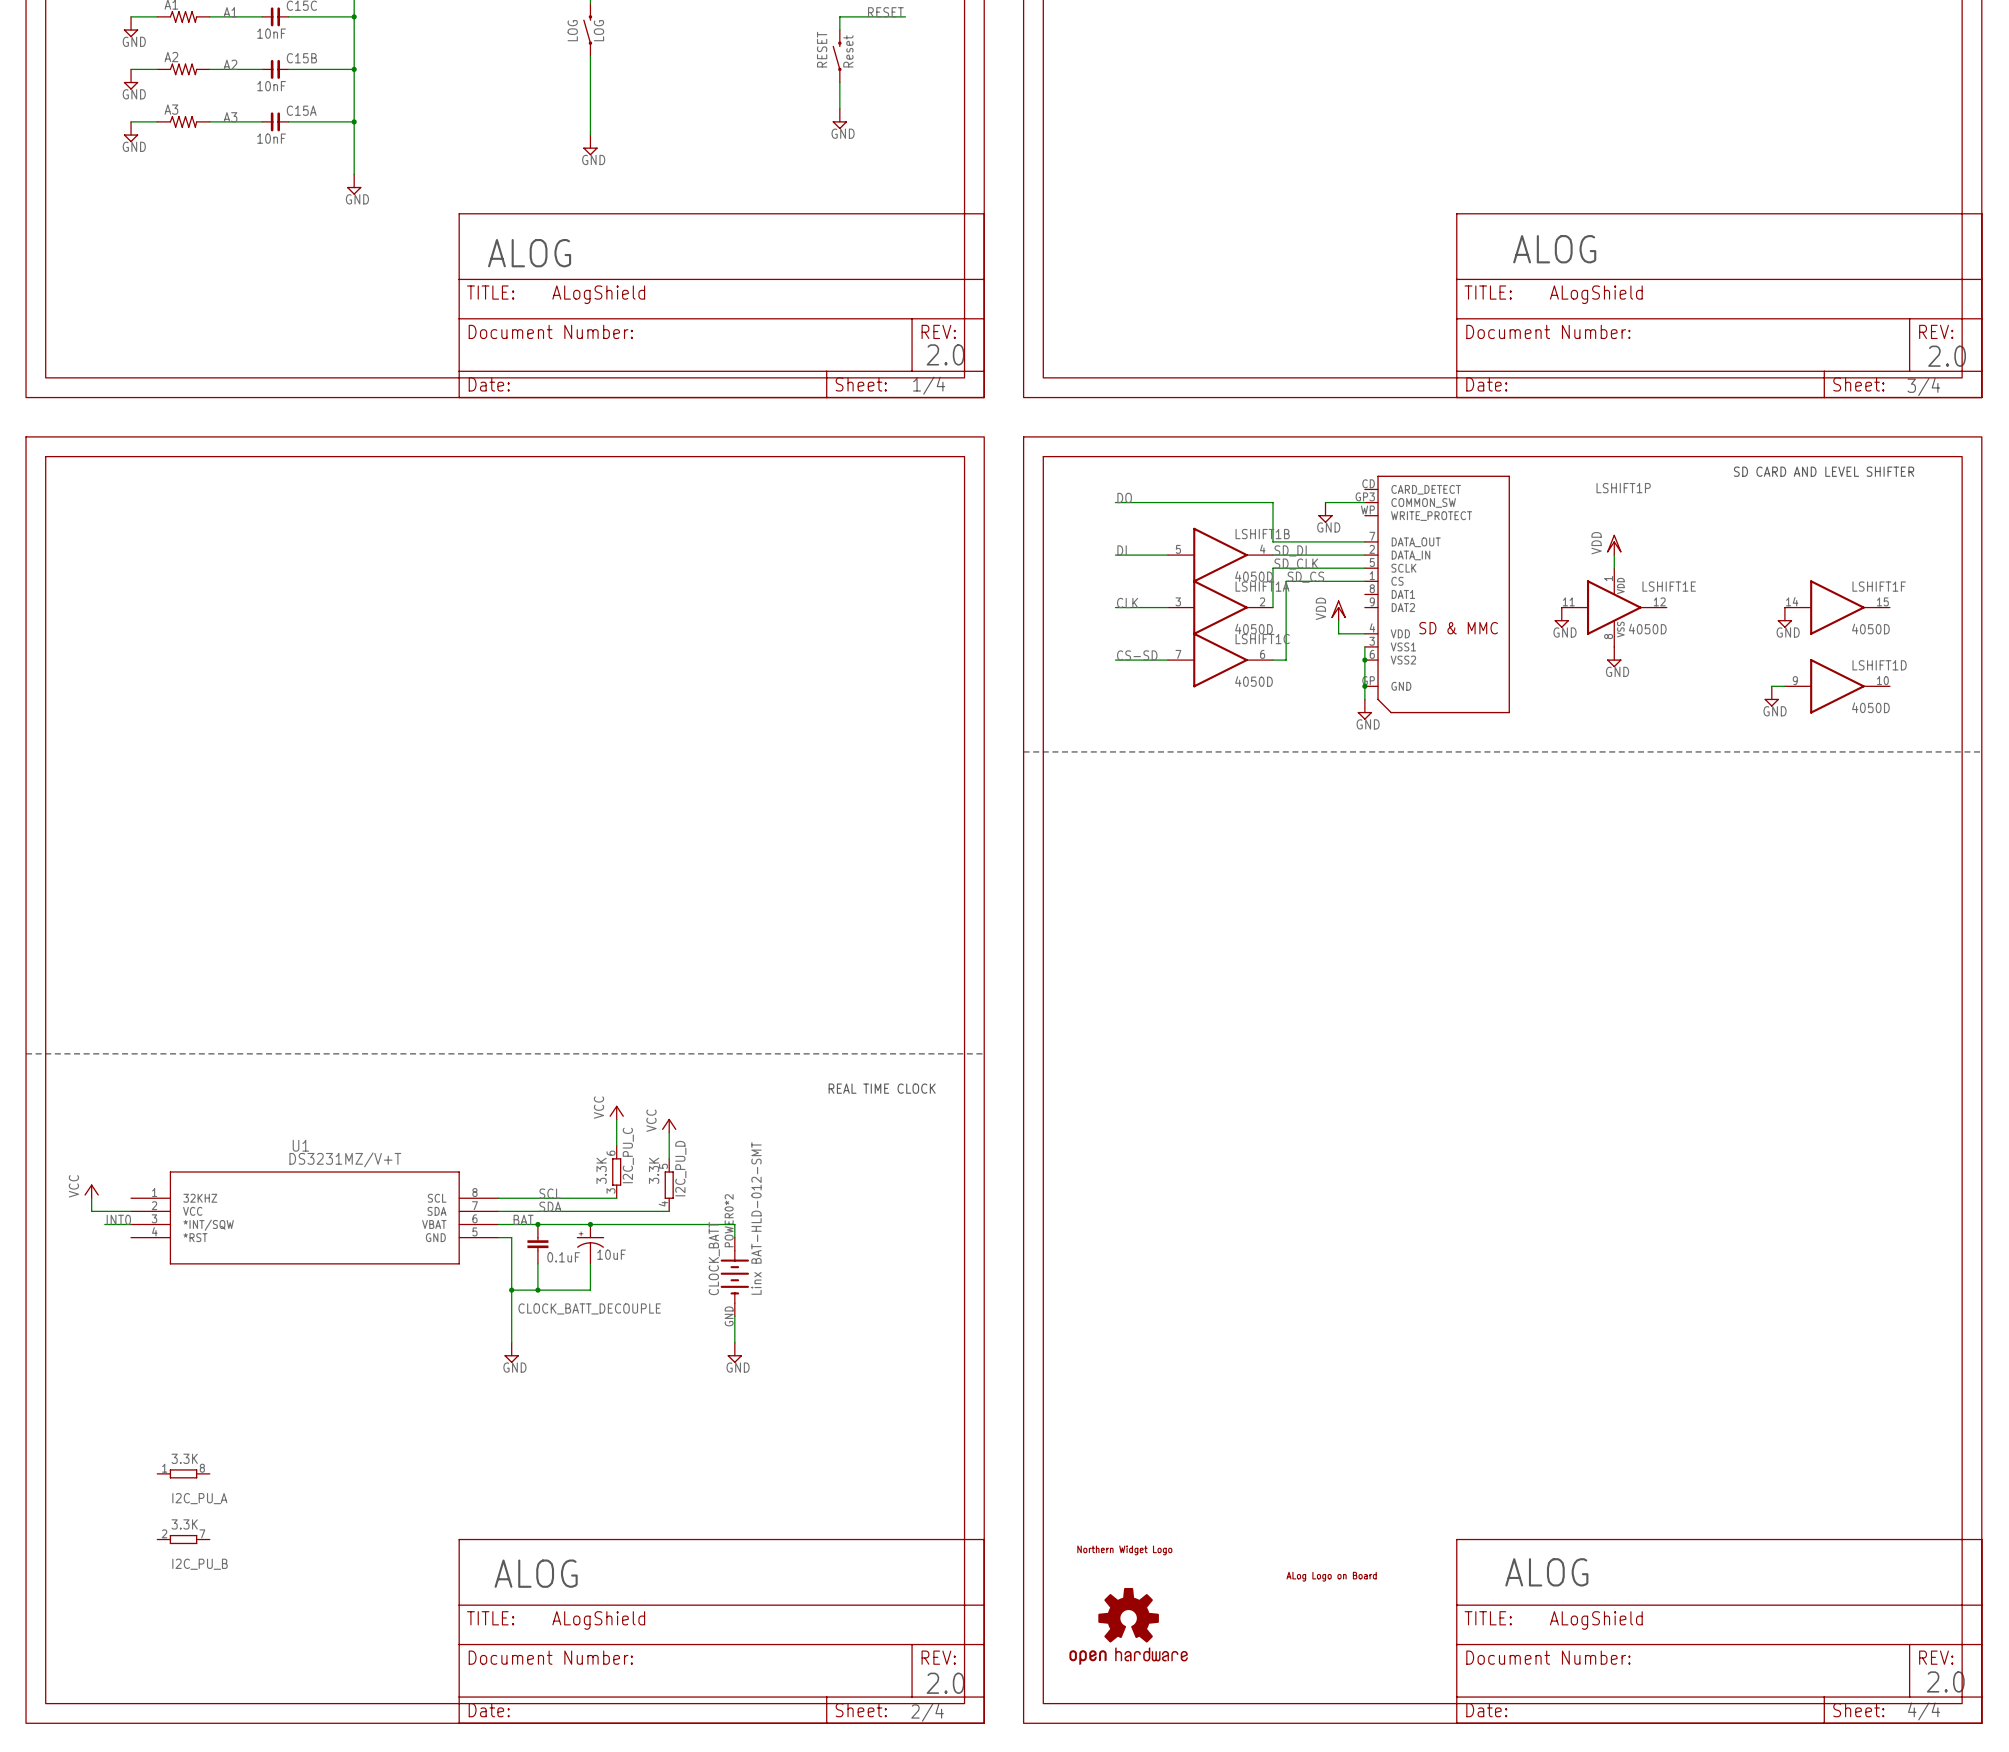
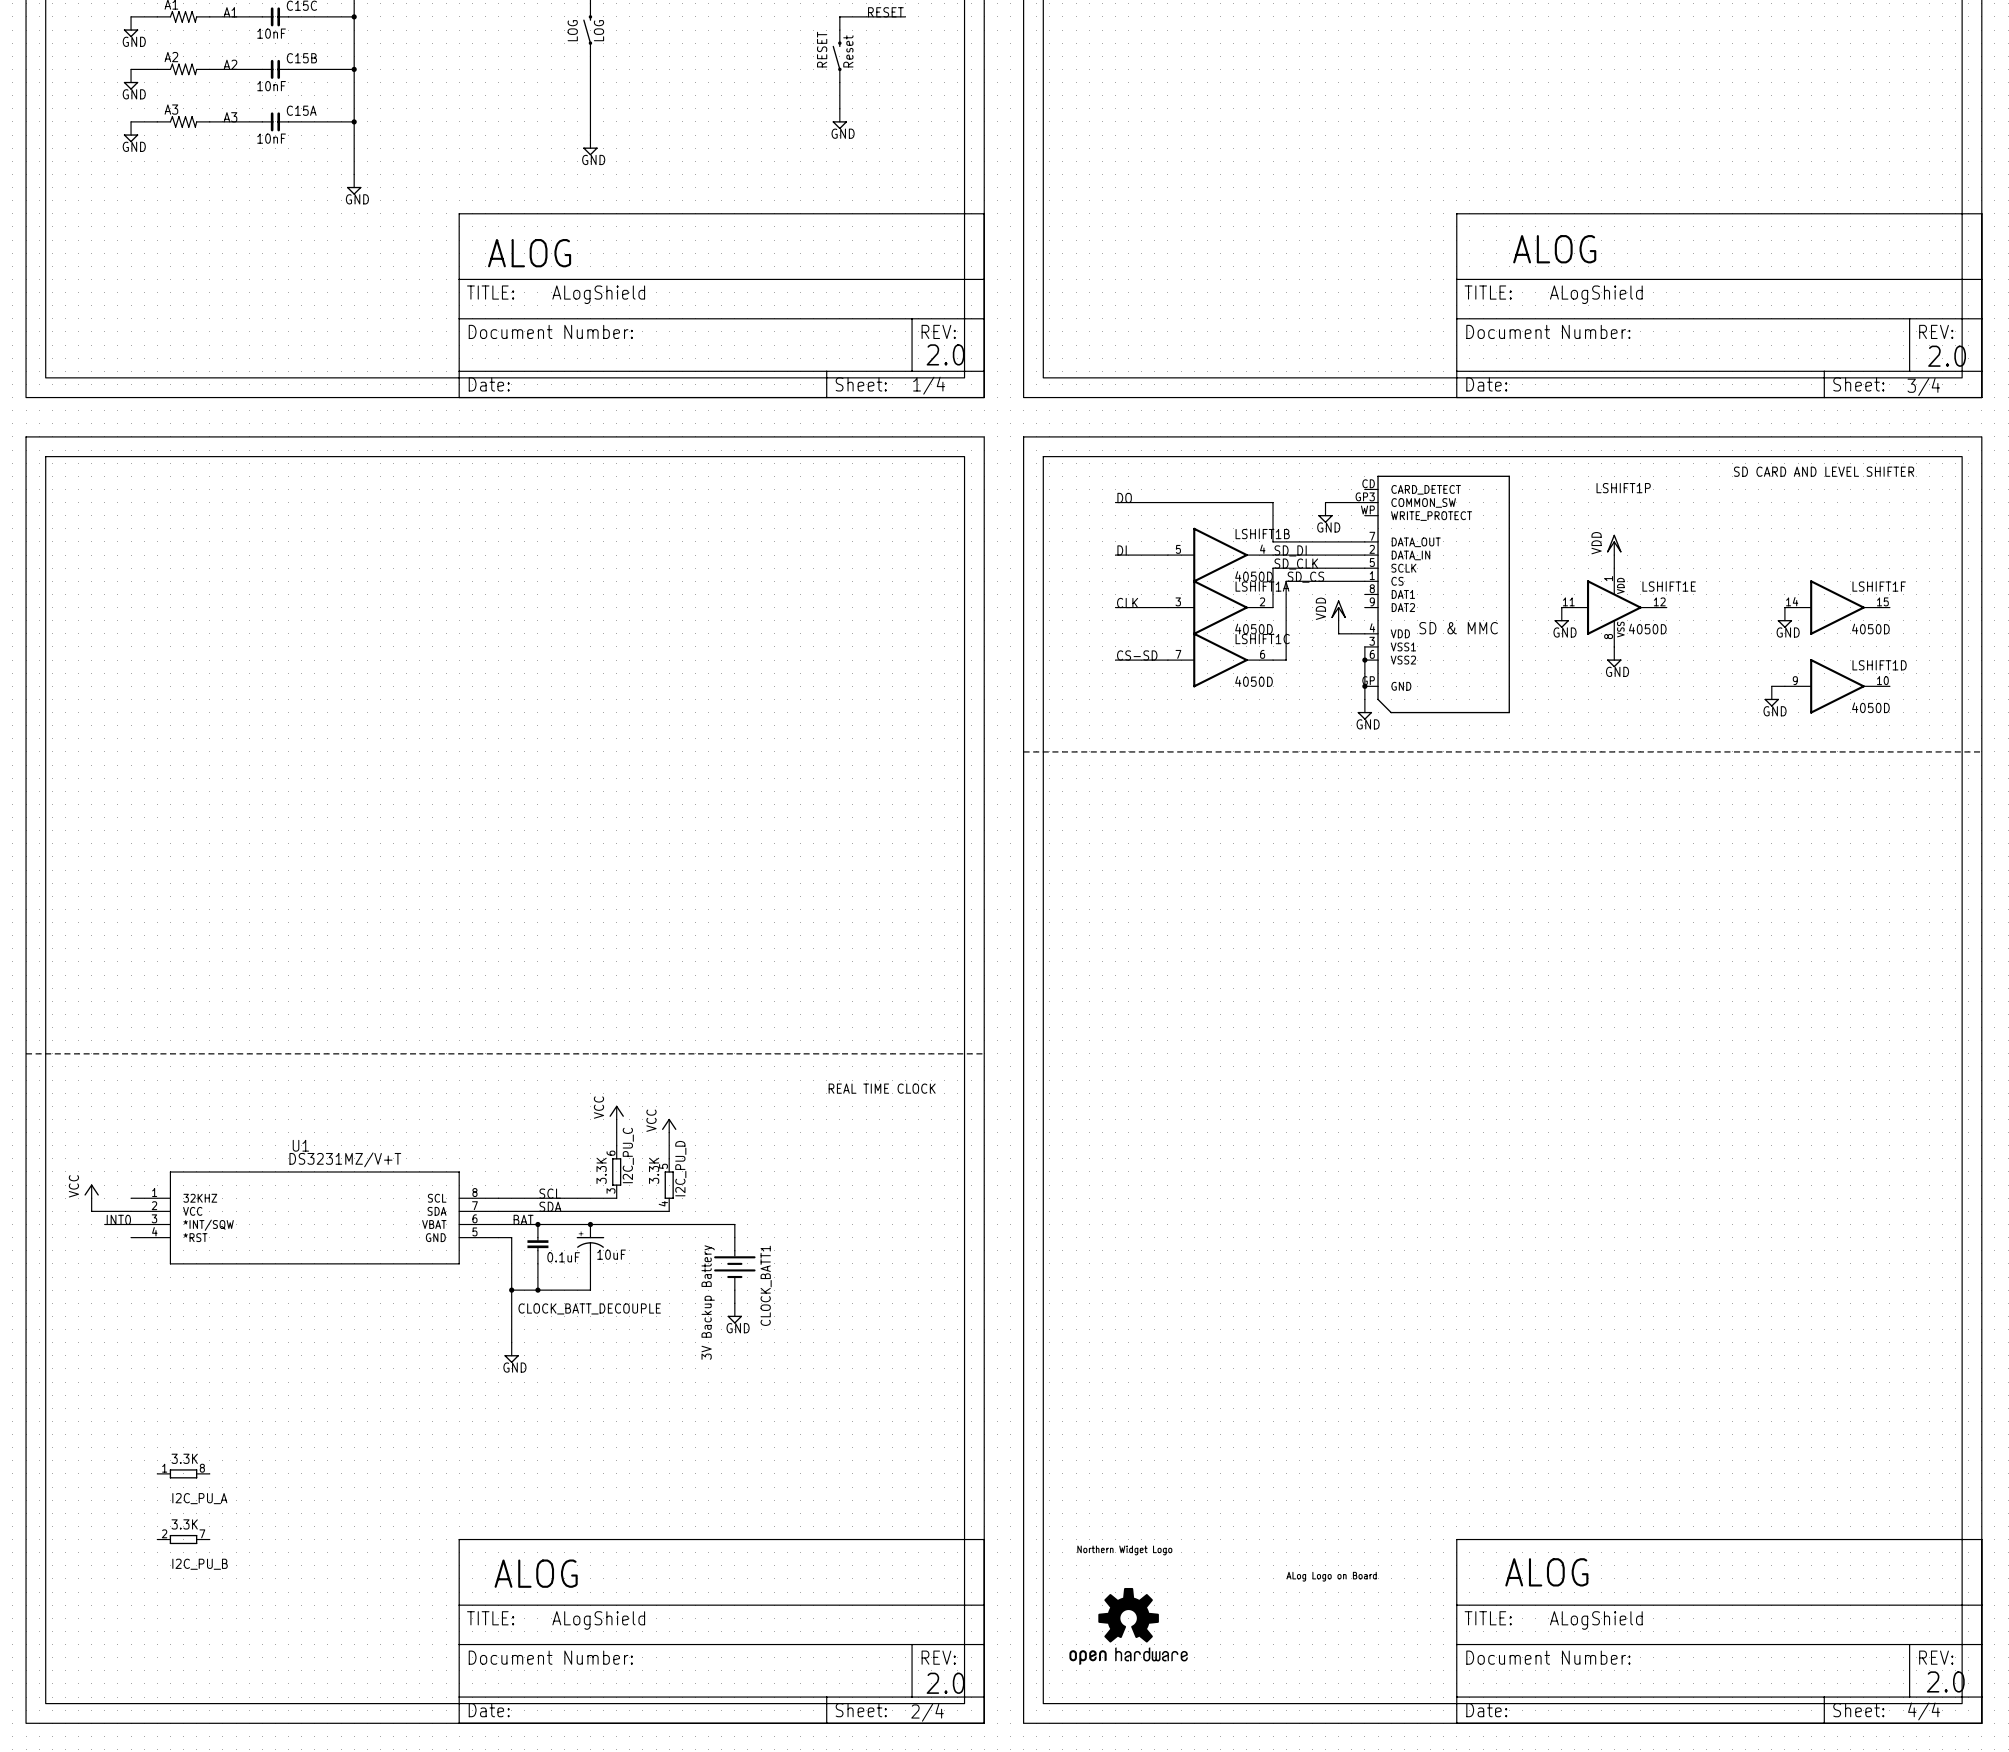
CLOCK_BATT1: none -> 3V Backup Battery (734, 1263)
CLOCK_BATT: Linx BAT-HLD-012-SMT (734, 1277) -> none
wire: (734, 1316) (734, 1342) -> none
power symbol position: GND (734, 1352) -> GND (734, 1313)

